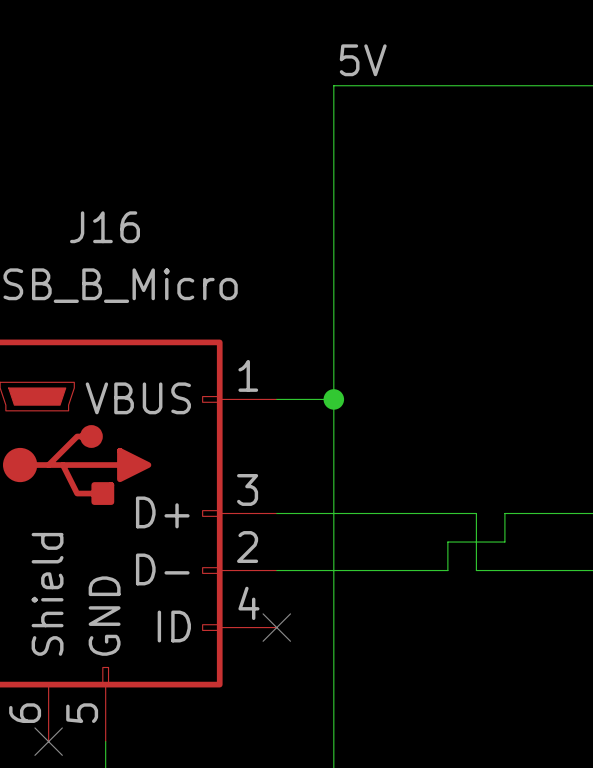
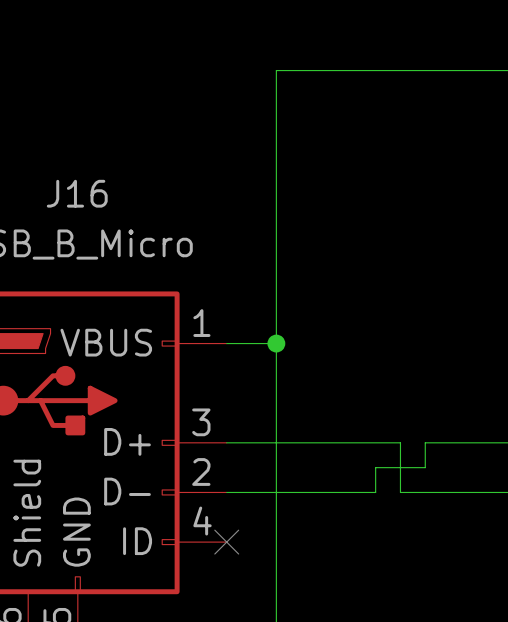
label: 5V (363, 60) -> none

